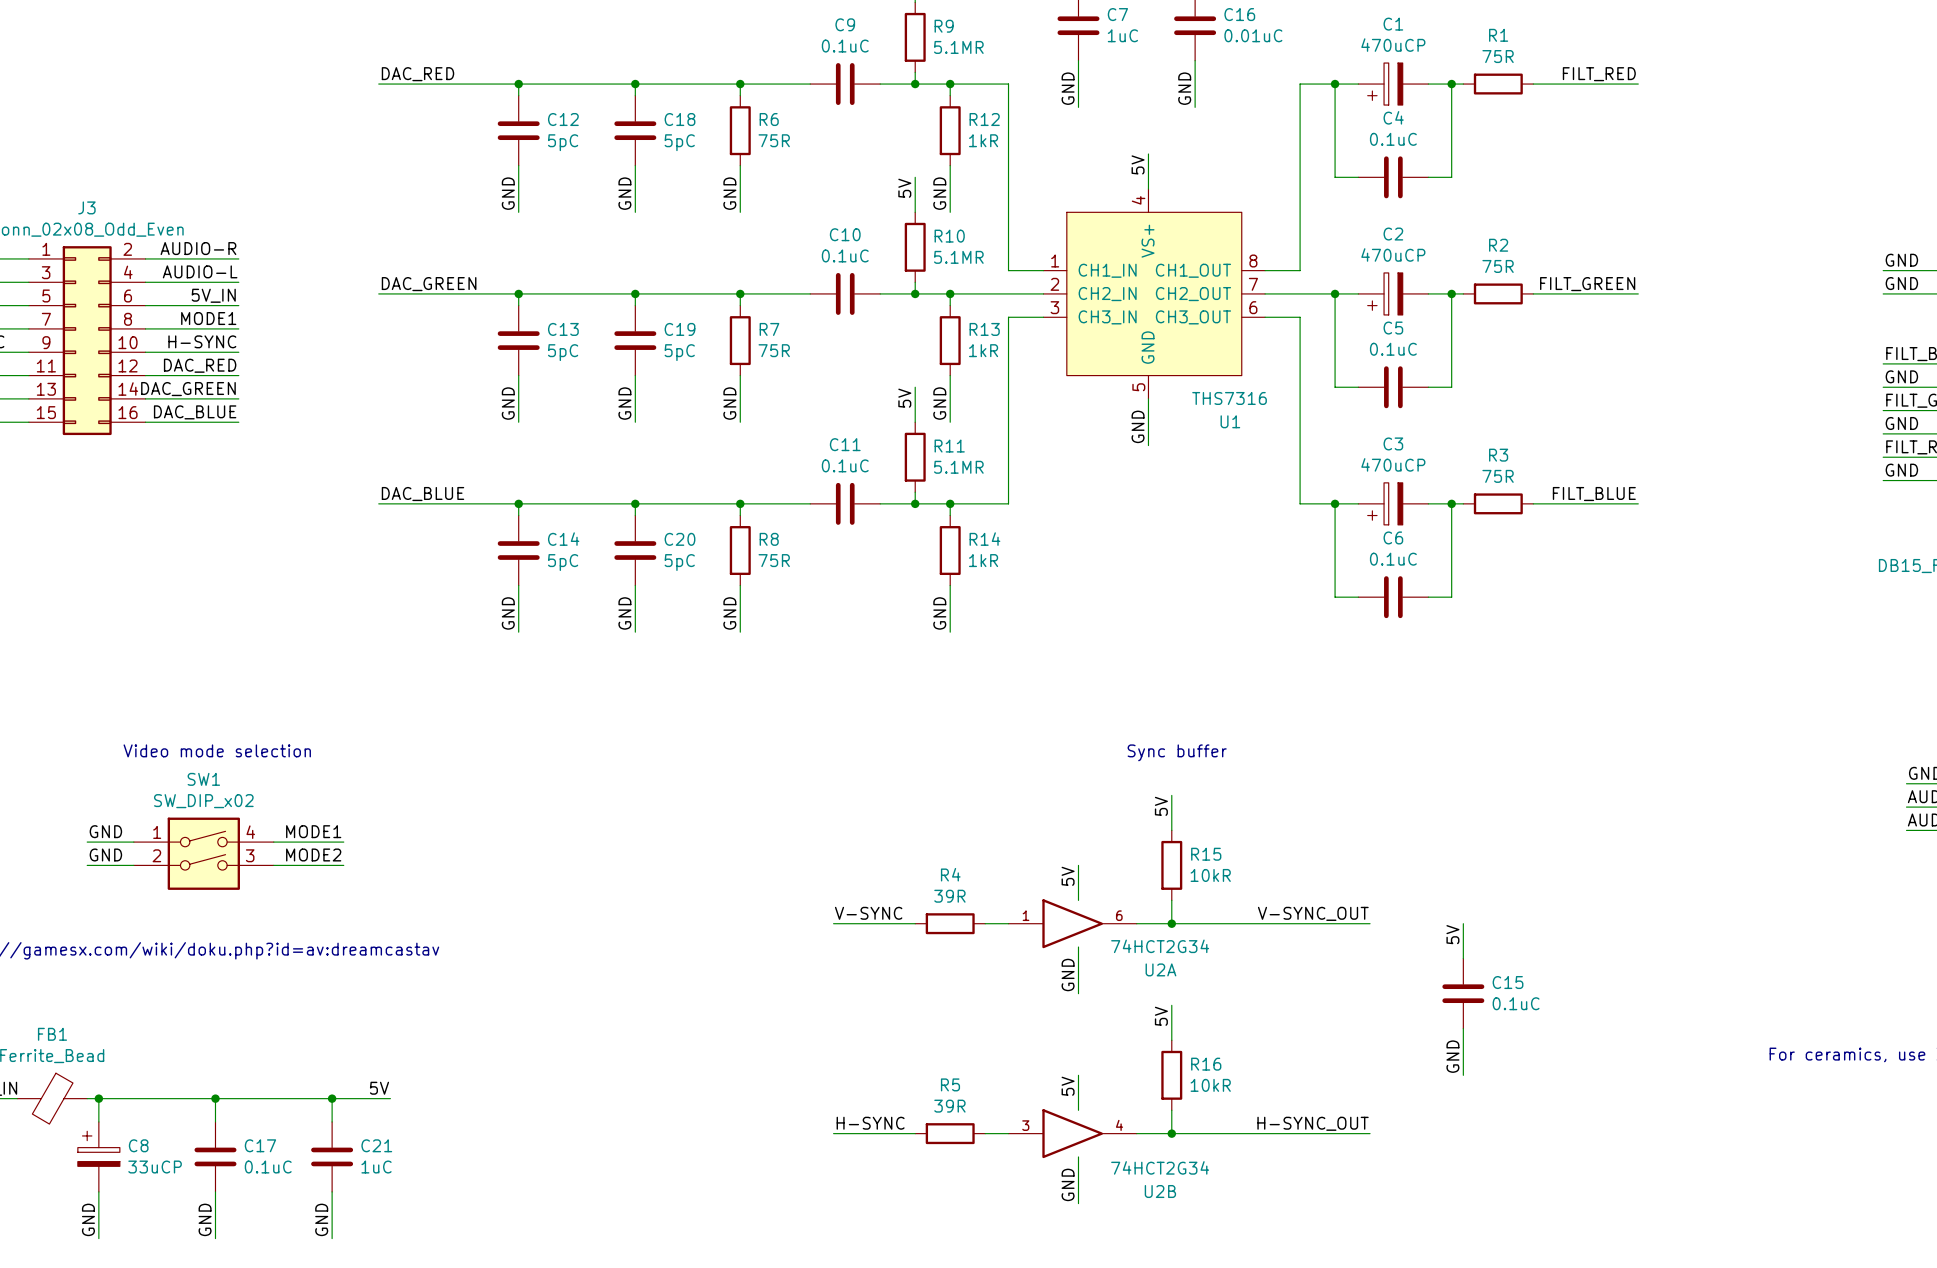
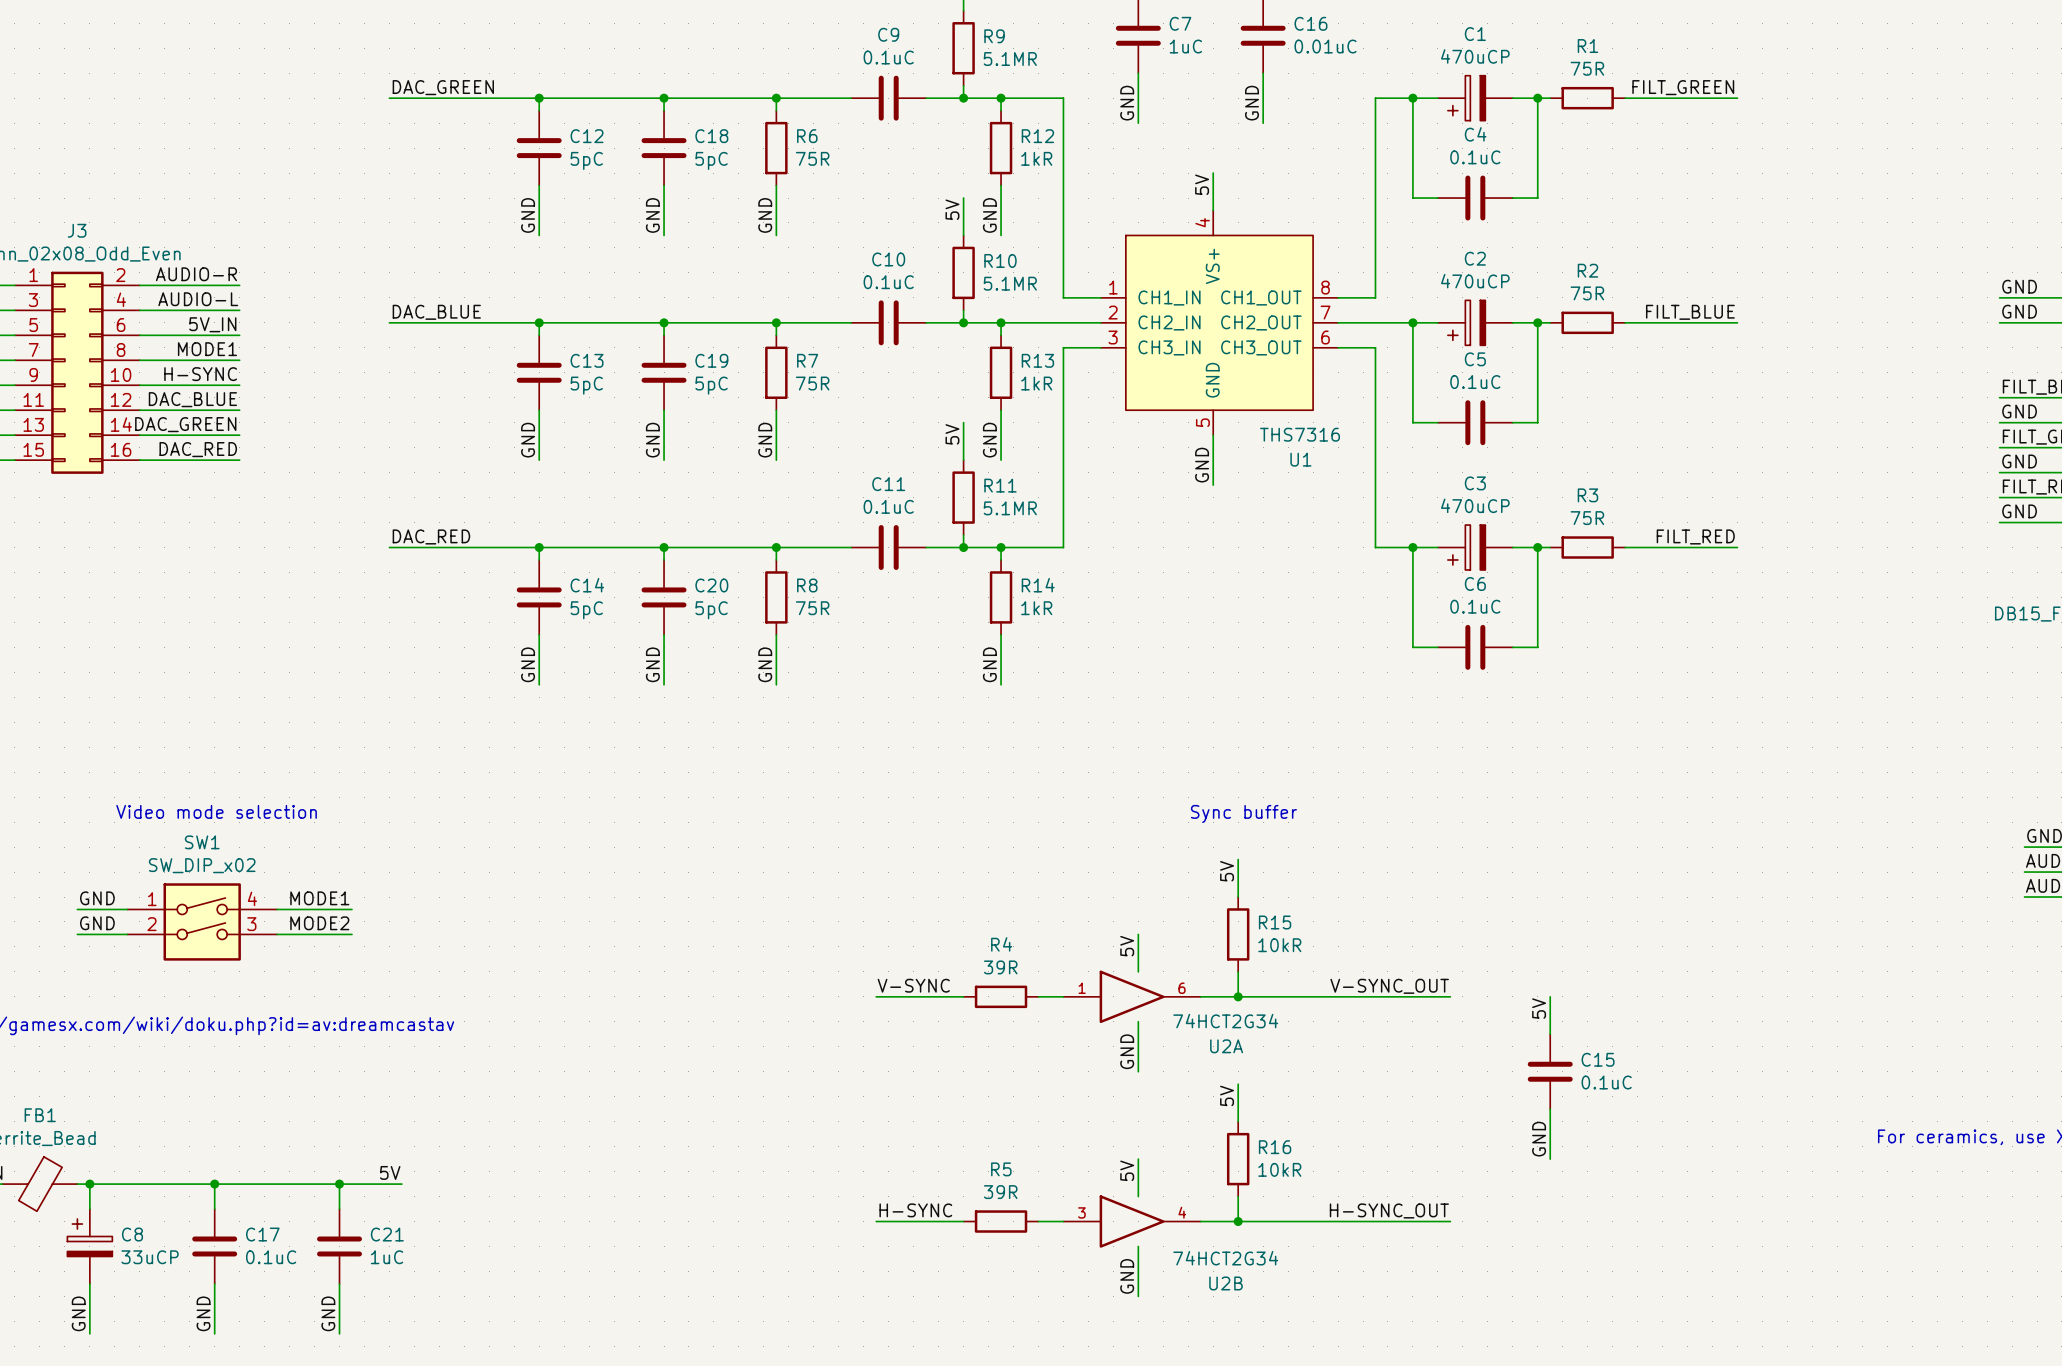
label: DAC_RED (417, 74) -> DAC_GREEN (443, 87)
label: FILT_RED (1599, 74) -> FILT_GREEN (1683, 87)
label: DAC_GREEN (429, 284) -> DAC_BLUE (436, 312)
label: FILT_GREEN (1587, 284) -> FILT_BLUE (1690, 312)
label: DAC_RED (200, 365) -> DAC_BLUE (192, 399)
label: DAC_BLUE (195, 412) -> DAC_RED (198, 449)
label: DAC_BLUE (422, 494) -> DAC_RED (431, 536)
label: FILT_BLUE (1594, 494) -> FILT_RED (1695, 536)

